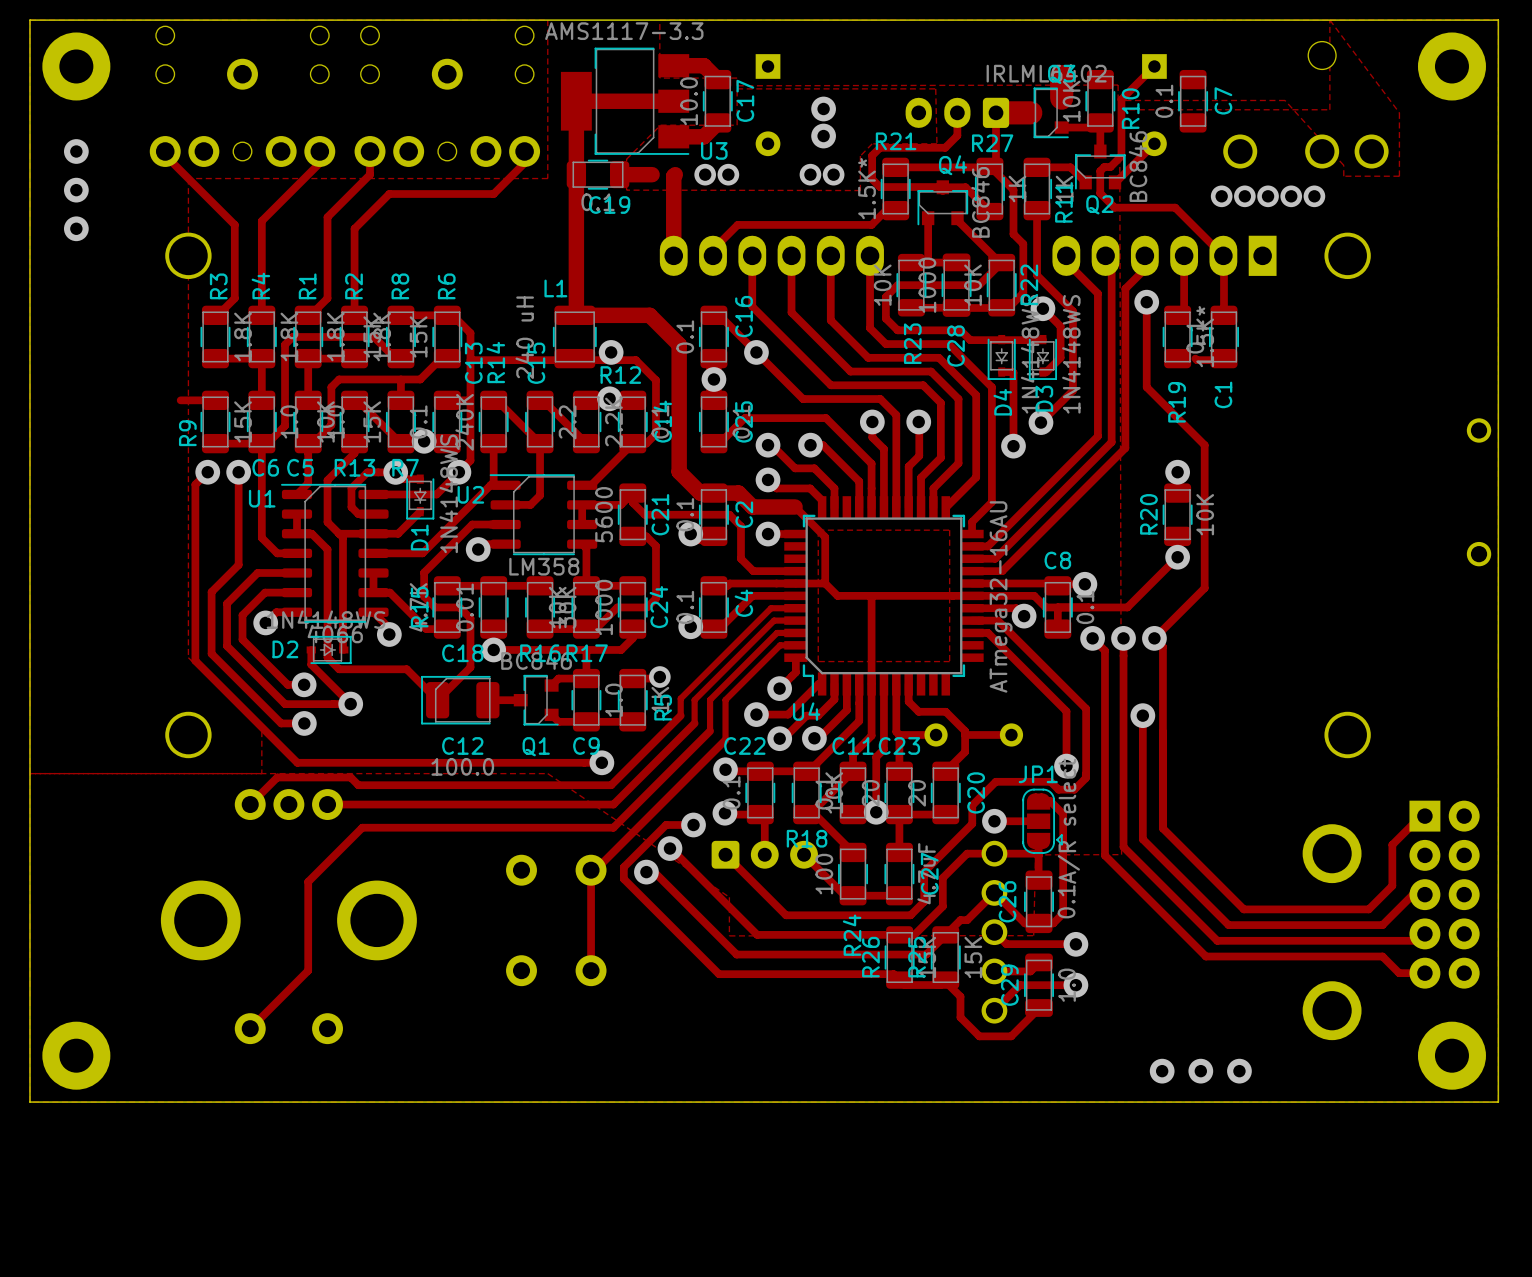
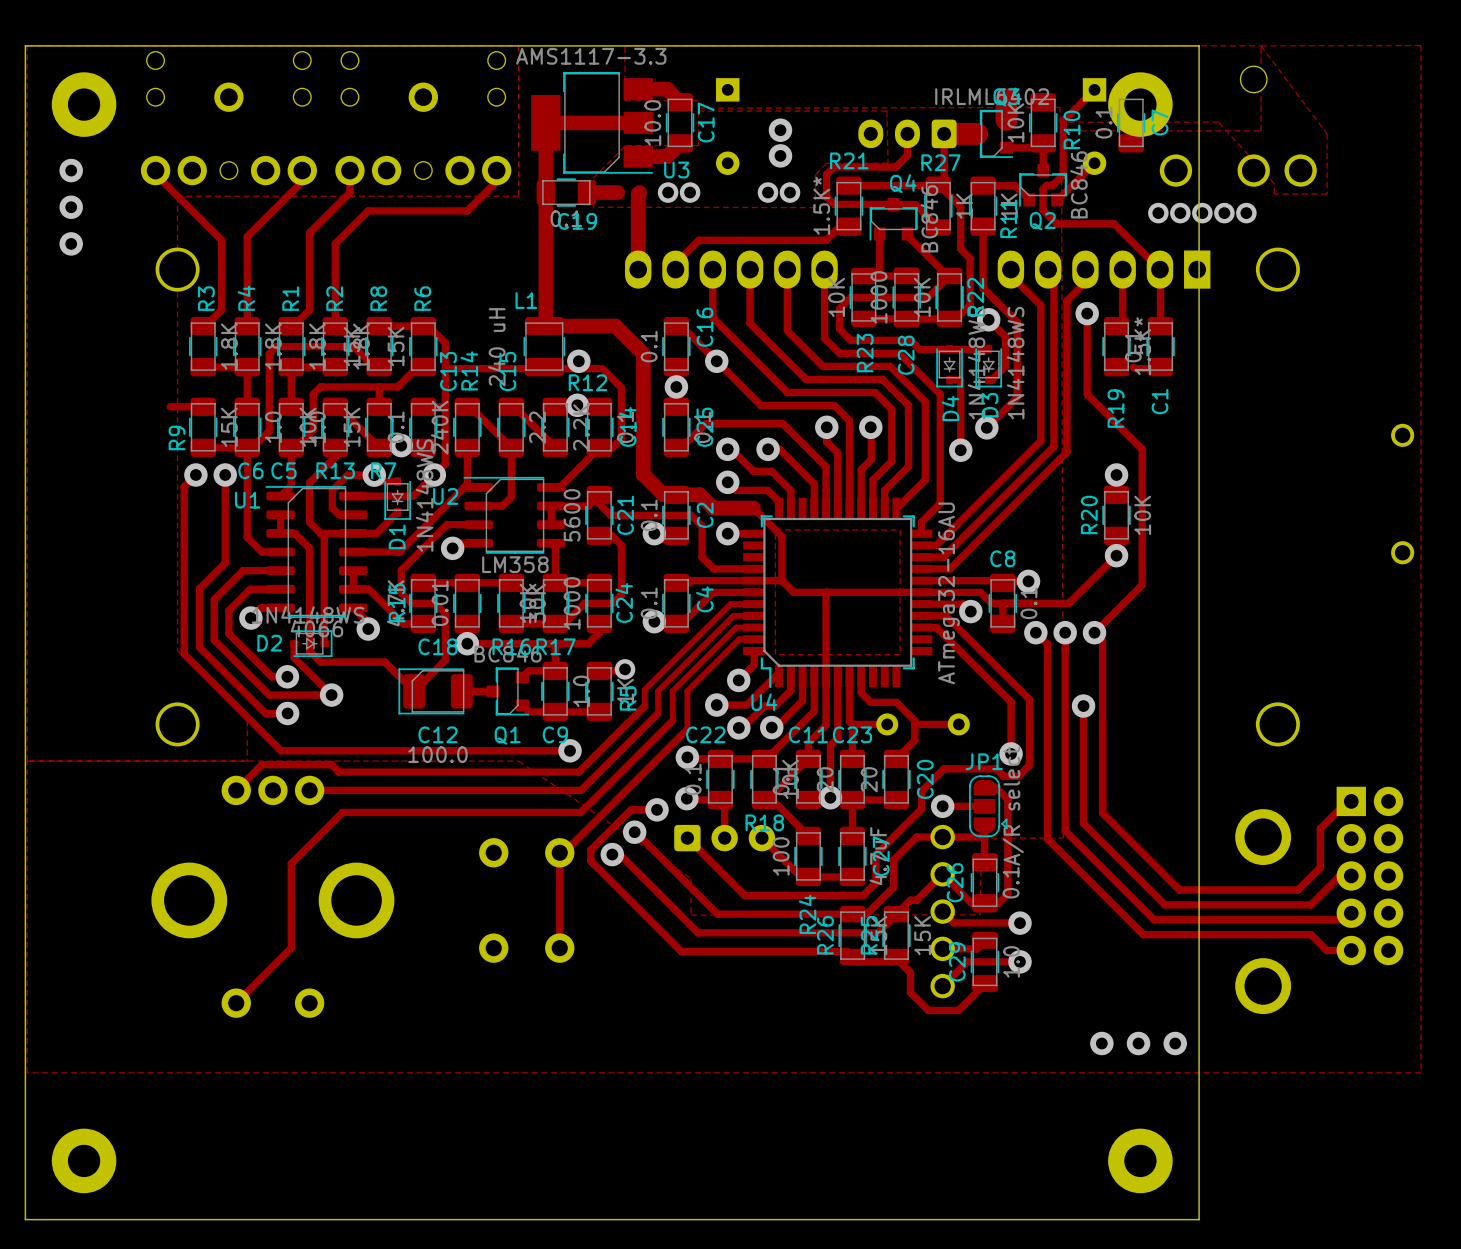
board edge: (29, 20) (29, 1102) (1498, 1102) (1498, 20) (1264, 20) -> (27, 45) (25, 45) (25, 1219) (1199, 1219) (1199, 45)
part position: (76, 66) -> (84, 104)
part position: (1451, 66) -> (1140, 104)
part position: (76, 1055) -> (84, 1160)
part position: (1451, 1055) -> (1140, 1160)

